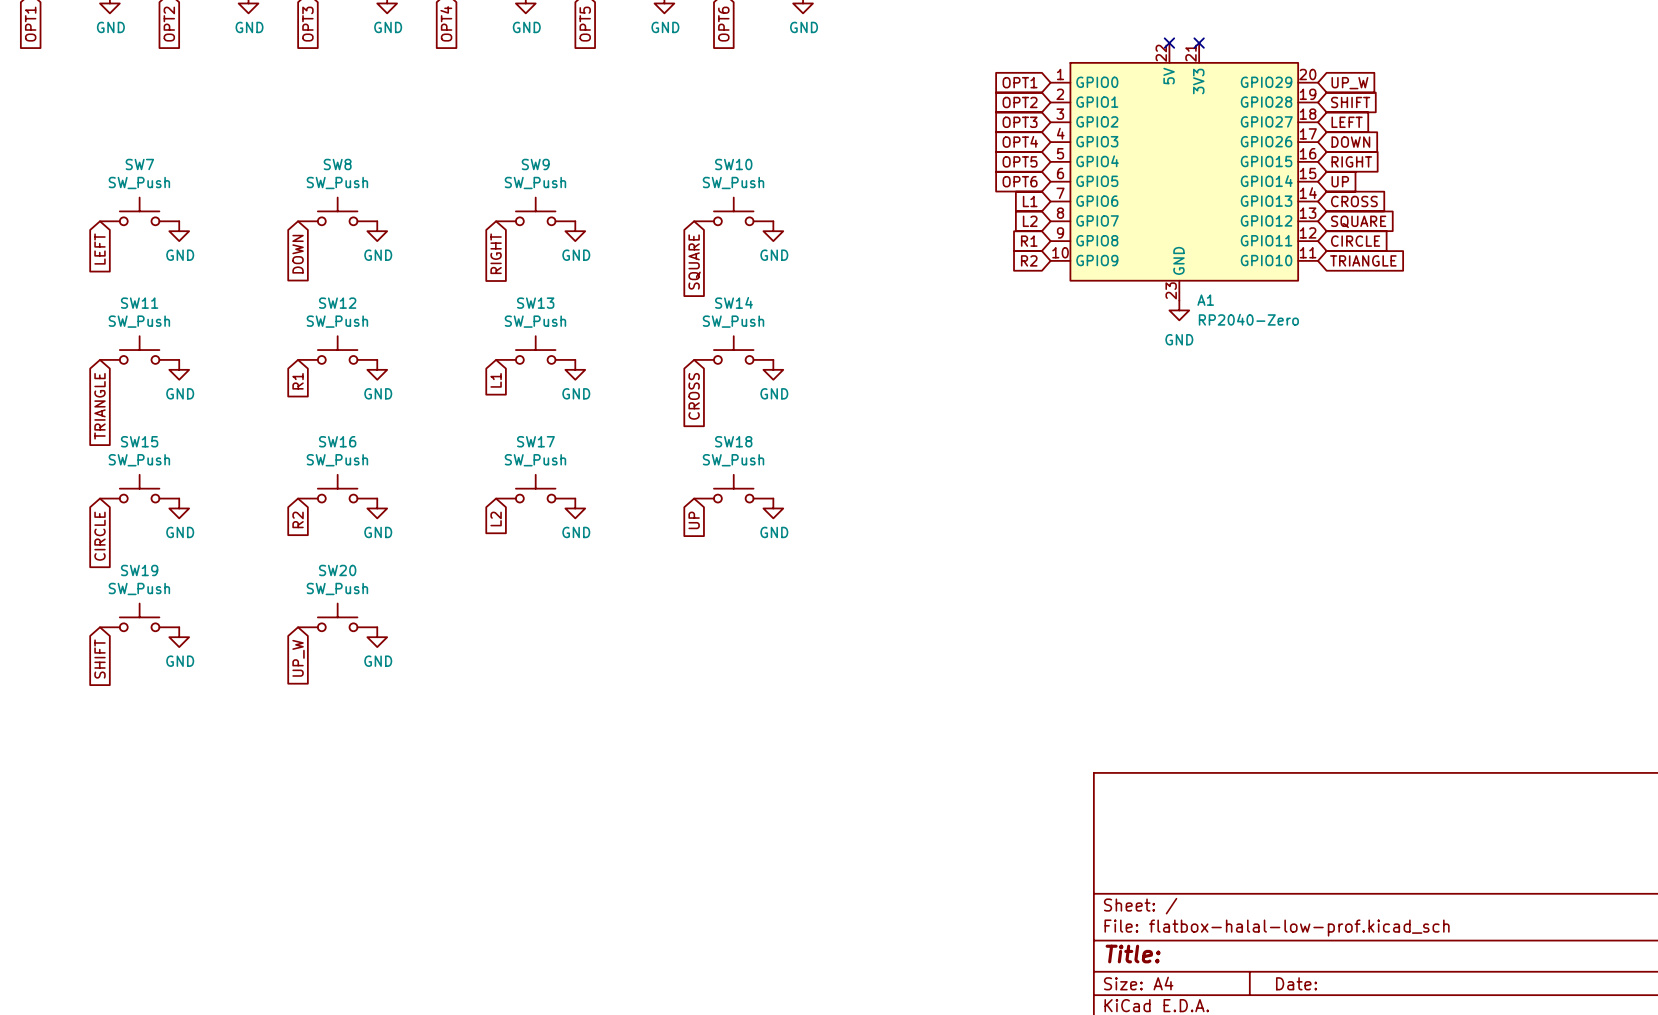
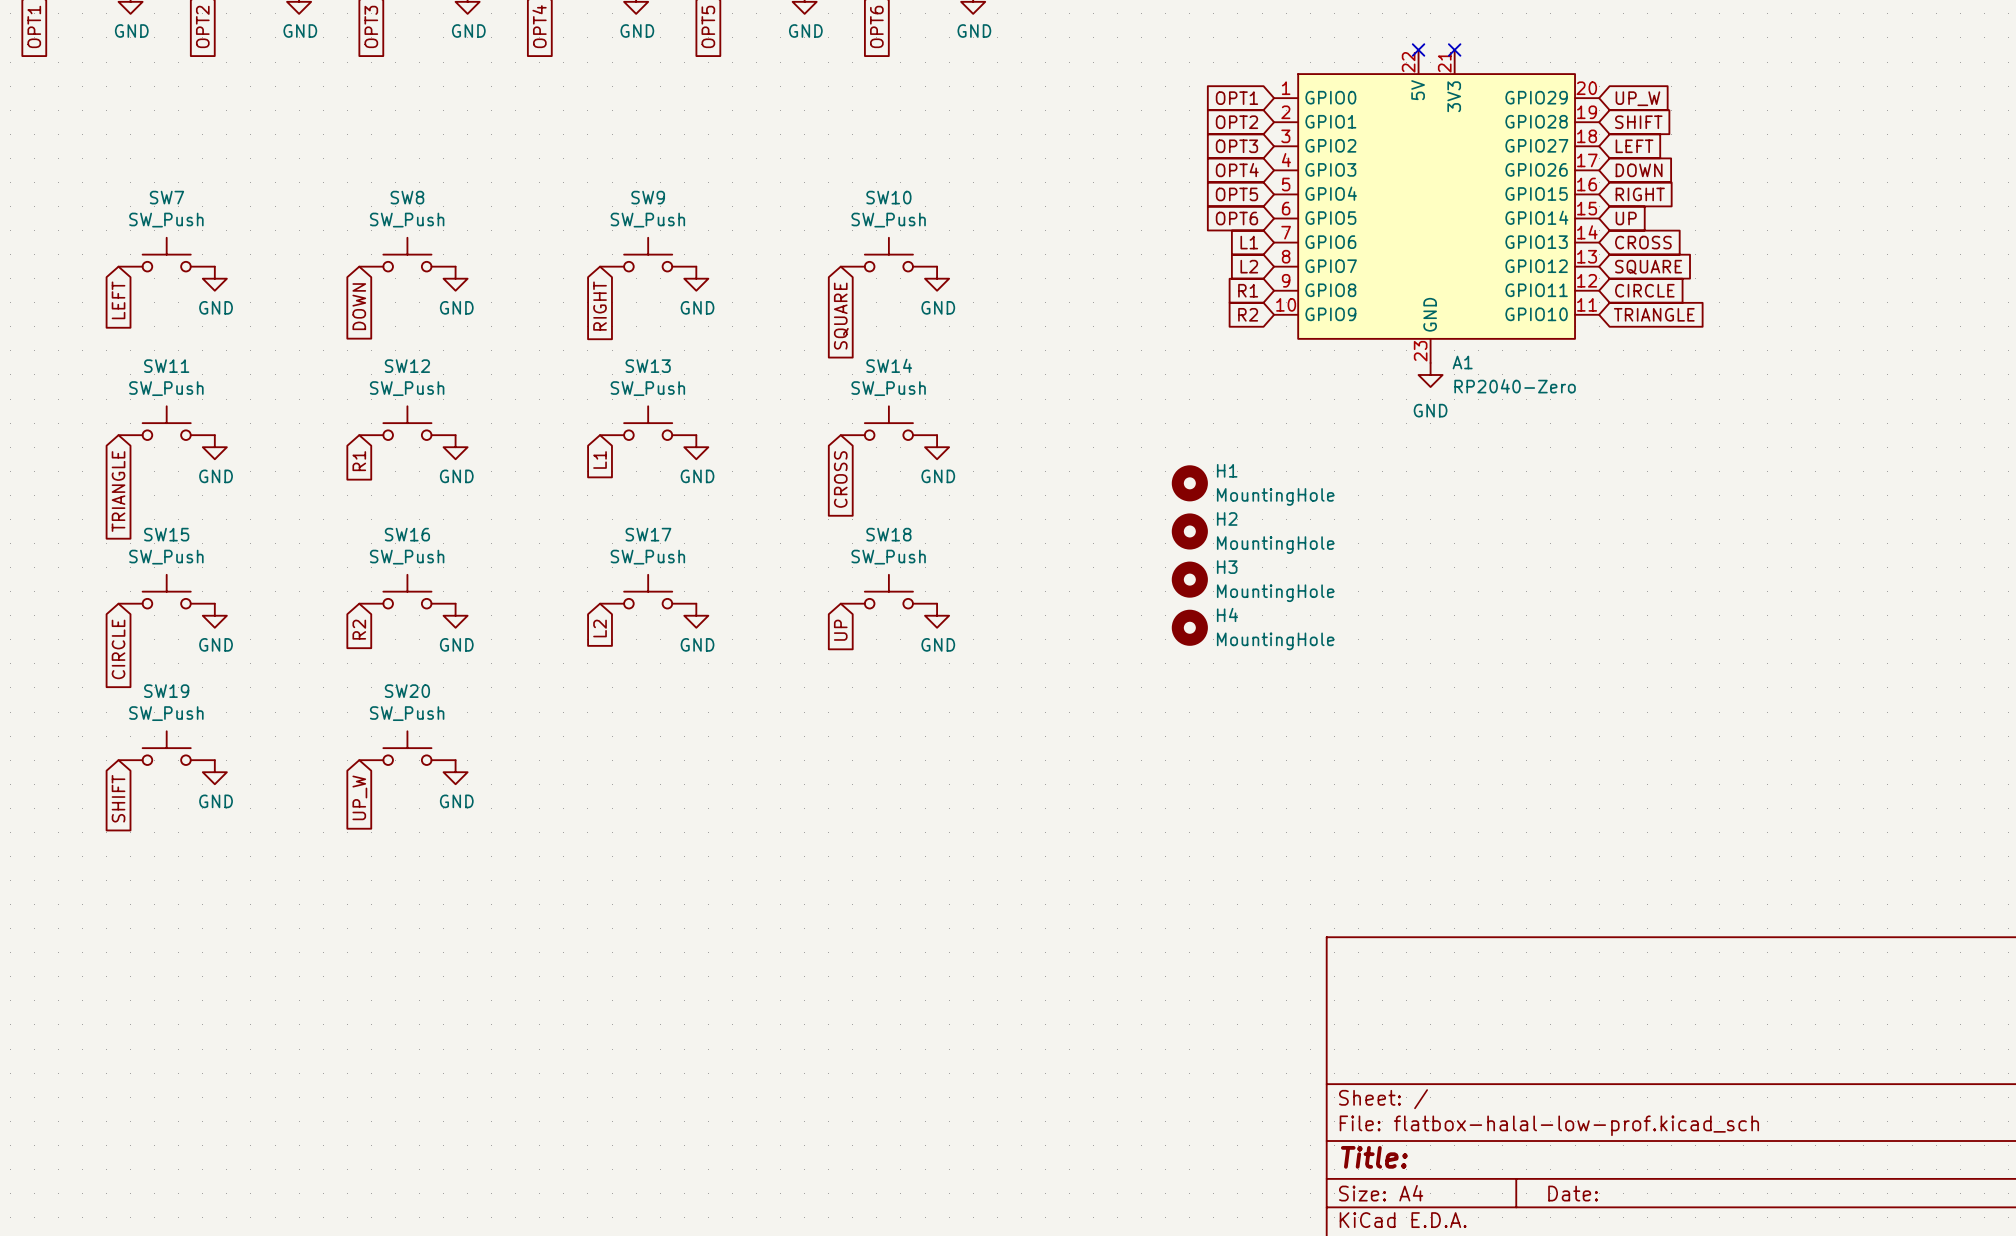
H1: none -> MountingHole (1189, 483)
H2: none -> MountingHole (1189, 531)
H3: none -> MountingHole (1189, 579)
H4: none -> MountingHole (1189, 627)

